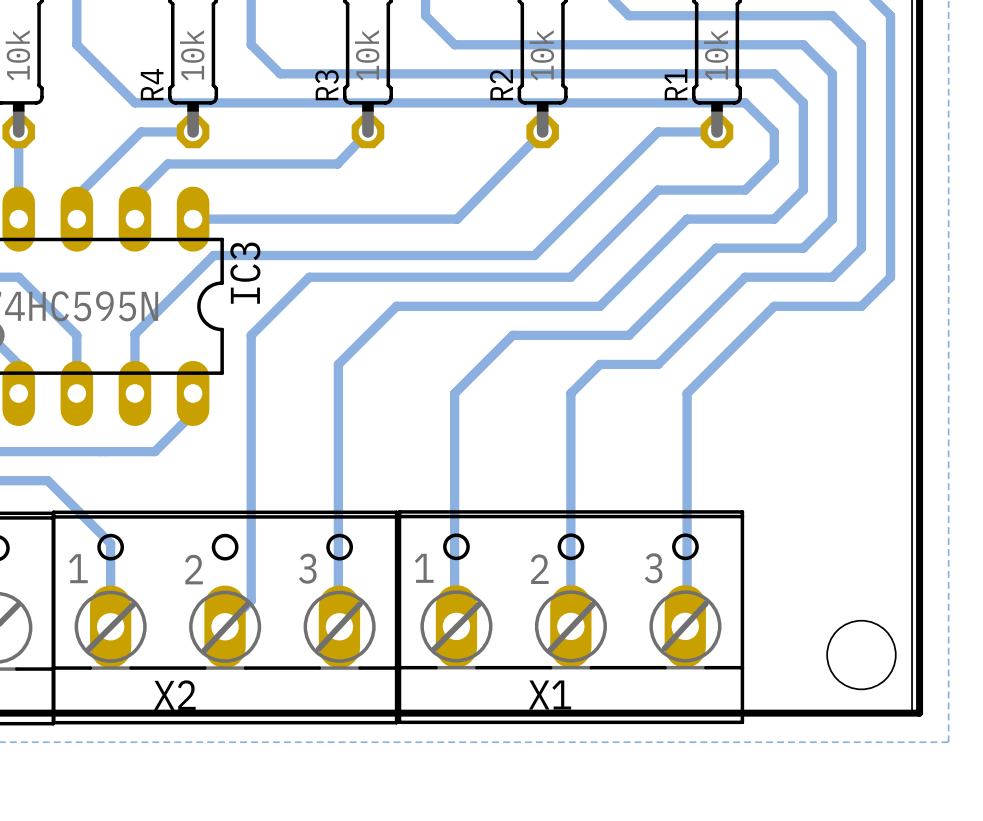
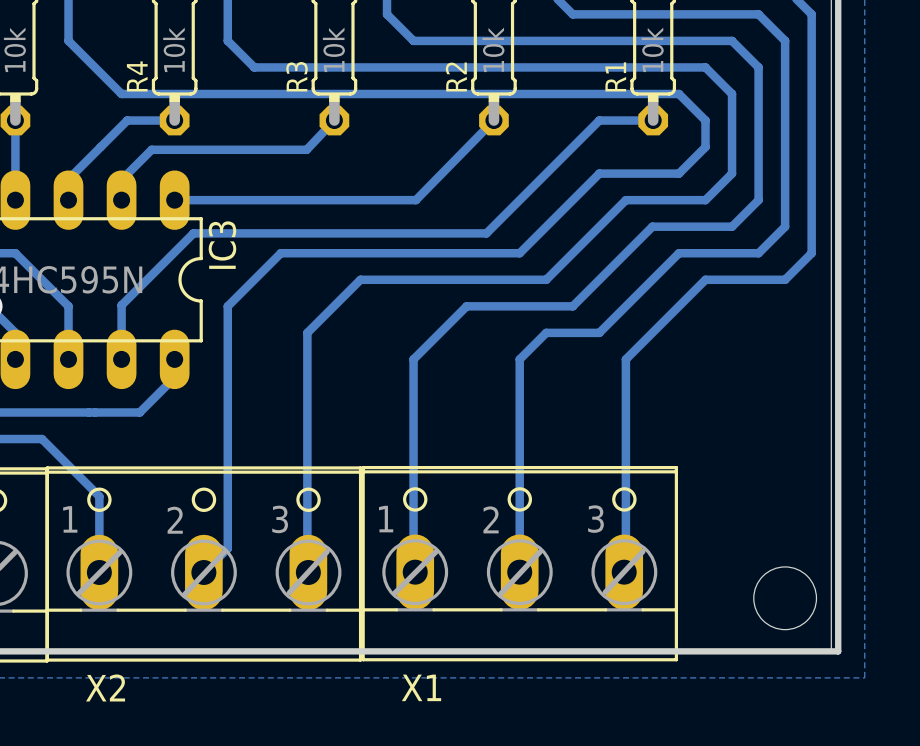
X2 name position: X2 (174, 695) -> X2 (105, 687)
X1 name position: X1 (550, 695) -> X1 (421, 687)

